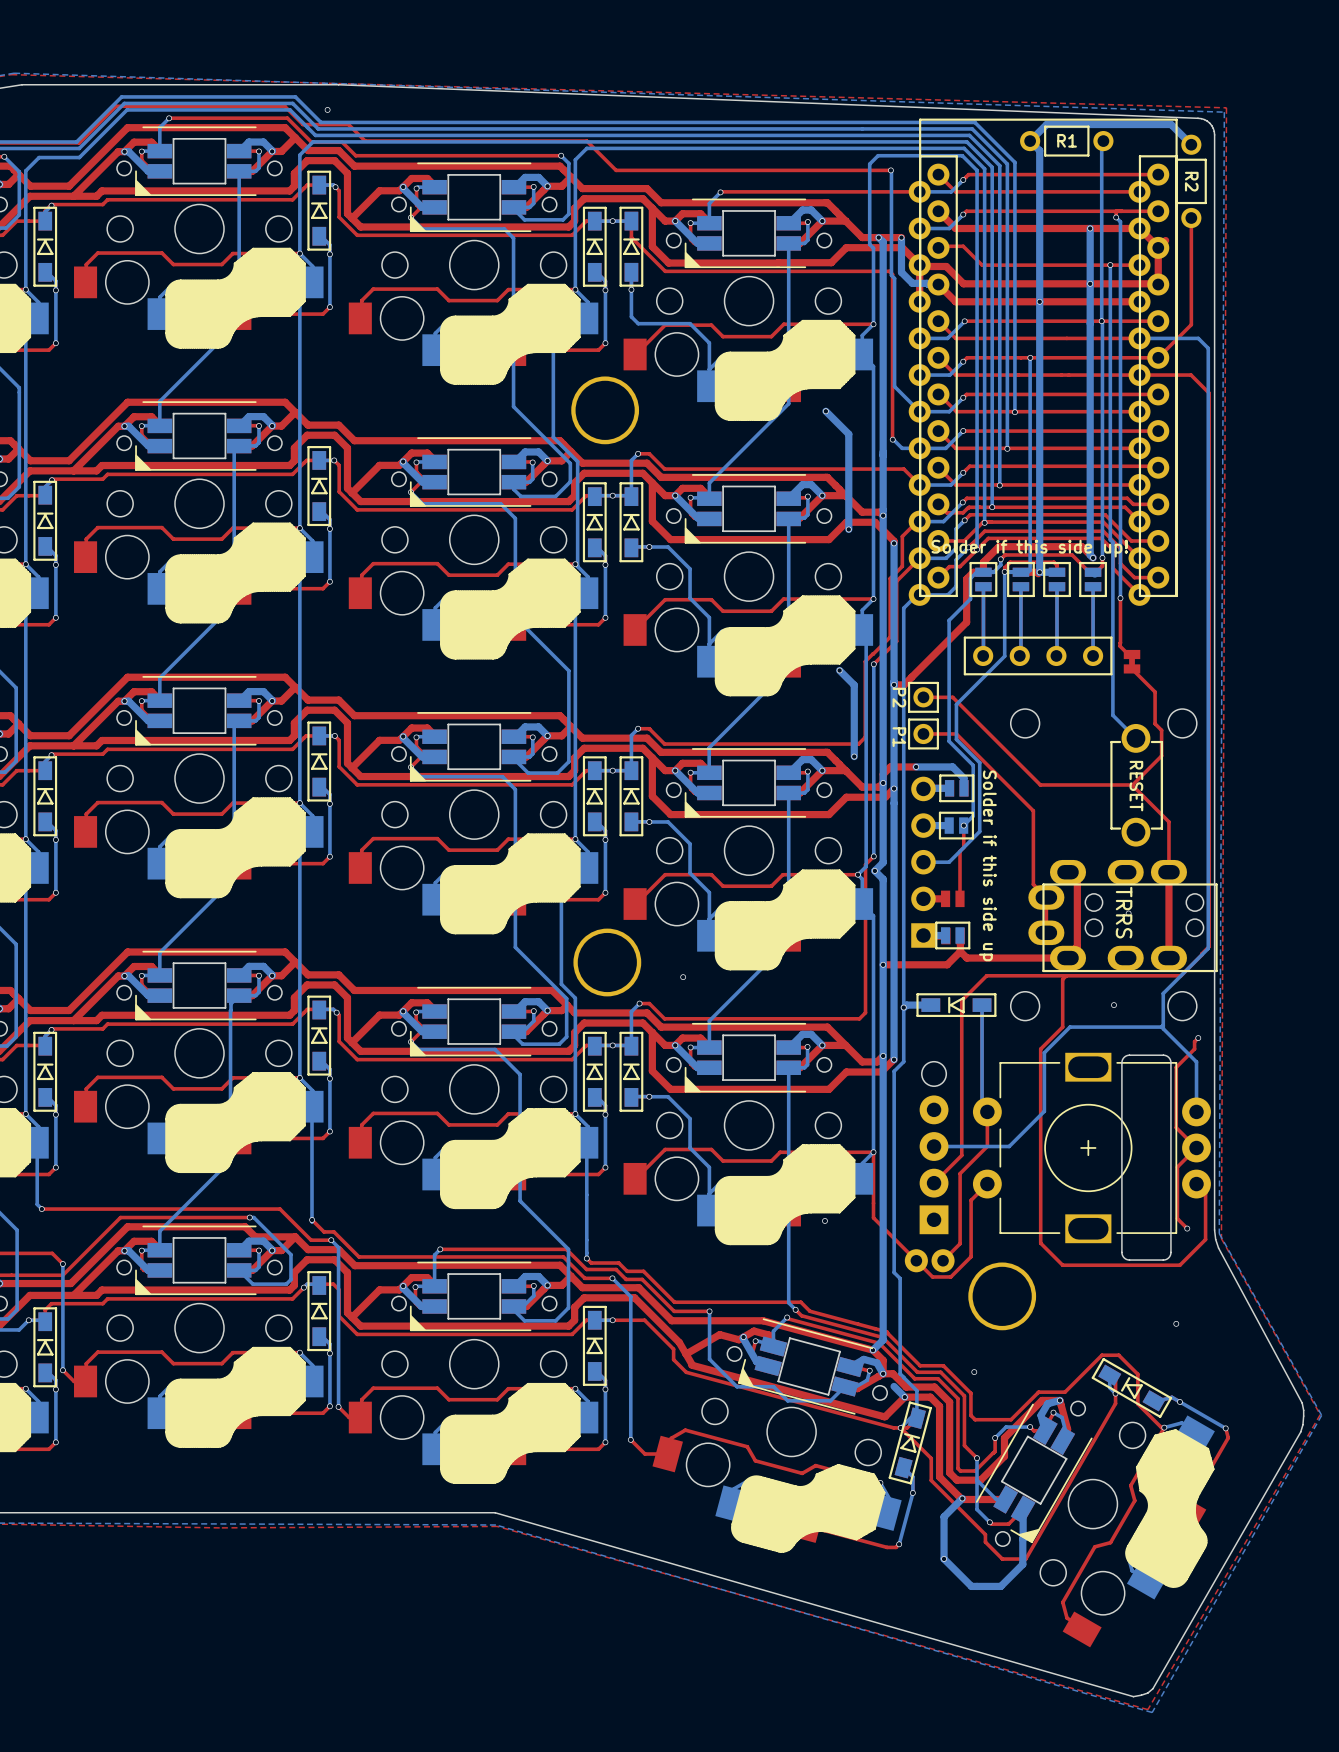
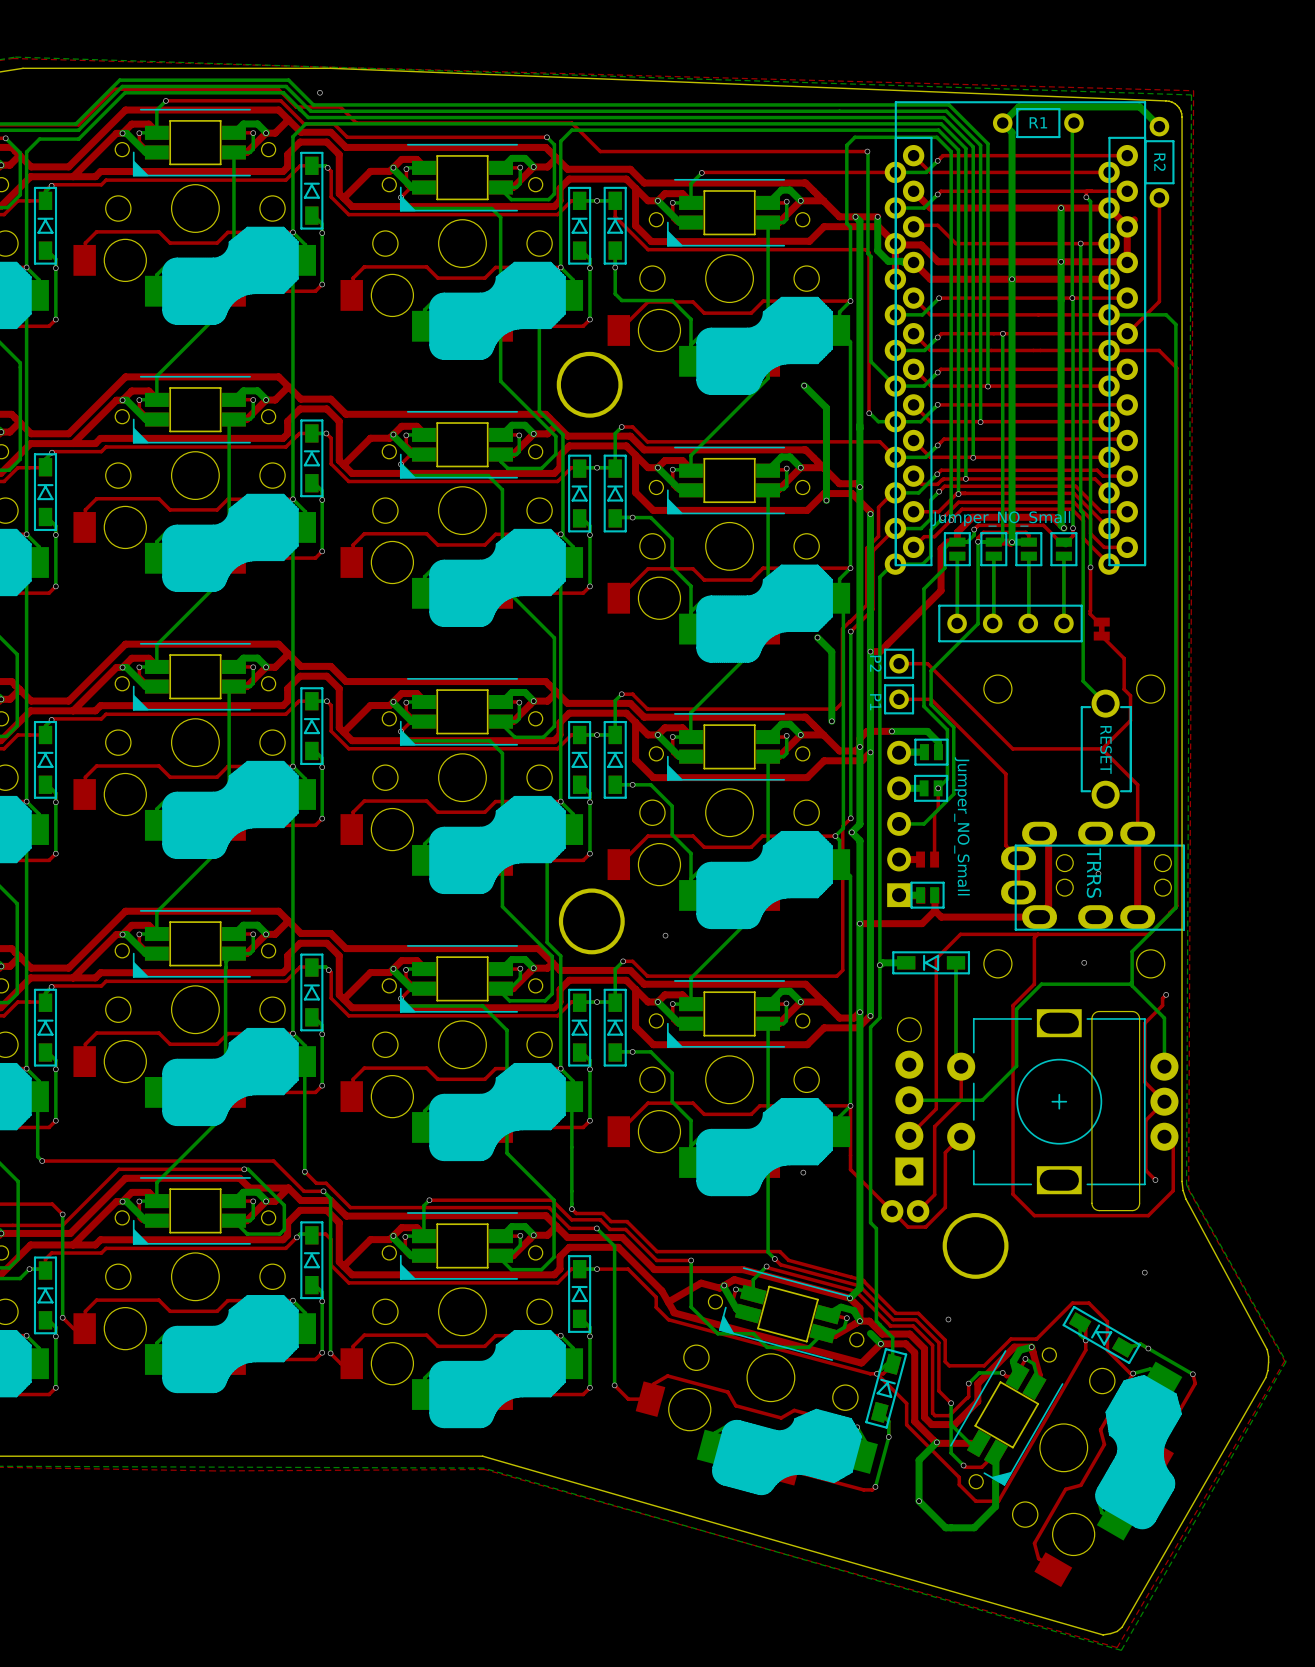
part value: Solder if this side up! (1029, 548) -> Jumper_NO_Small (1001, 518)
part value: Solder if this side up (987, 865) -> Jumper_NO_Small (961, 826)

